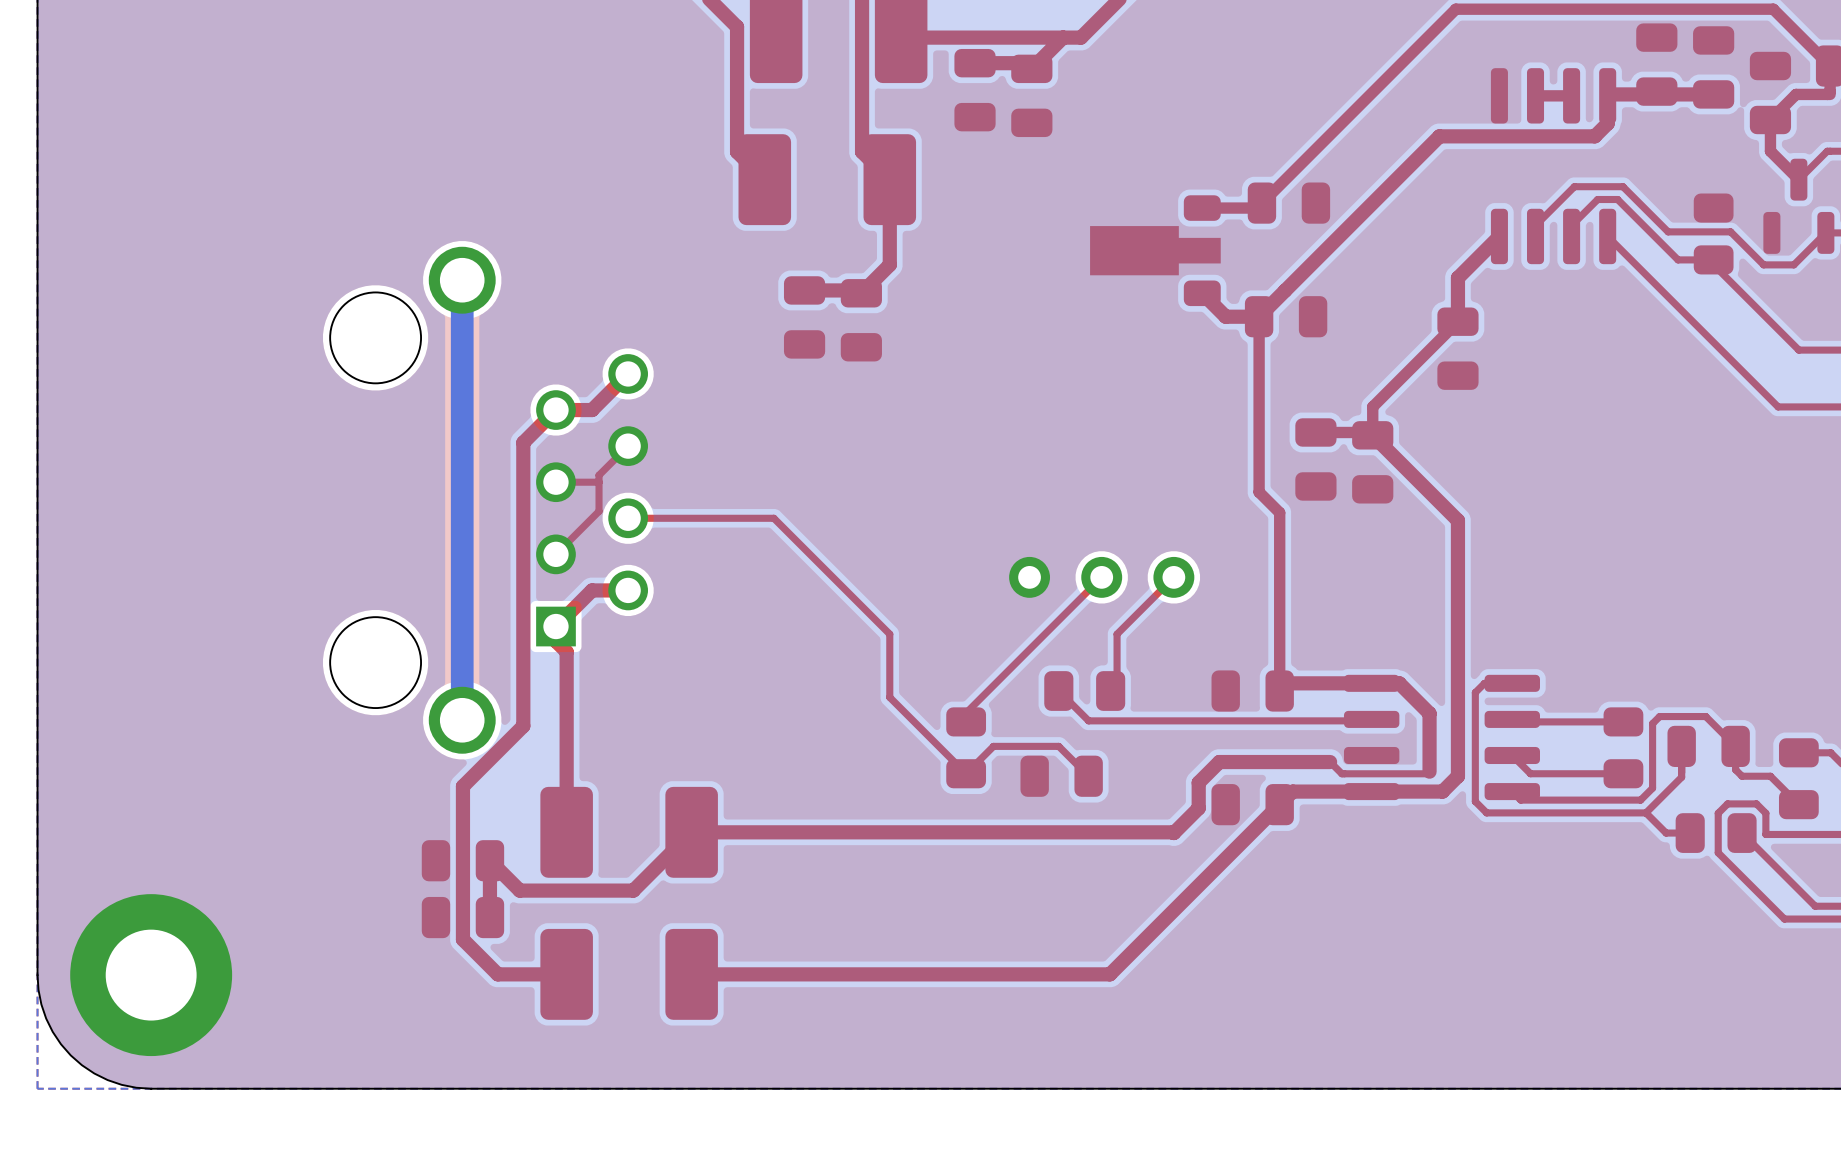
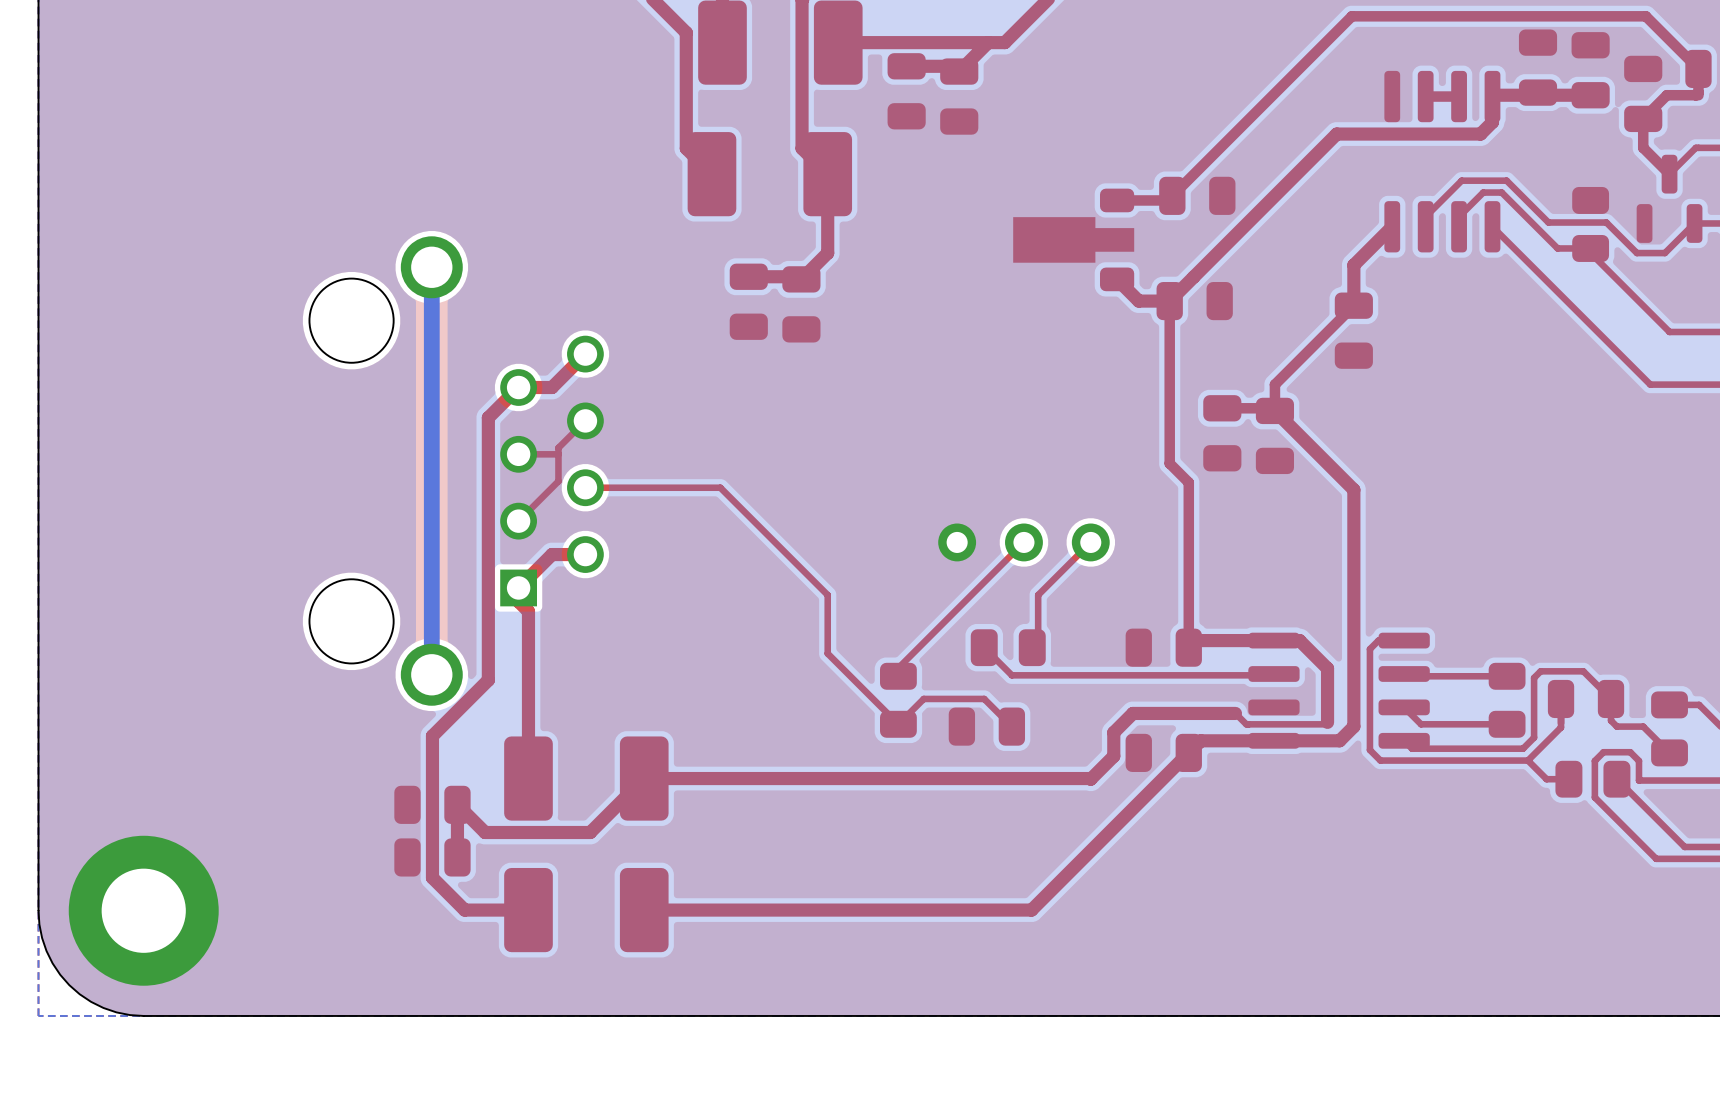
bottom track width: thick (462, 280) (462, 720) -> thin (431, 267) (431, 674)

